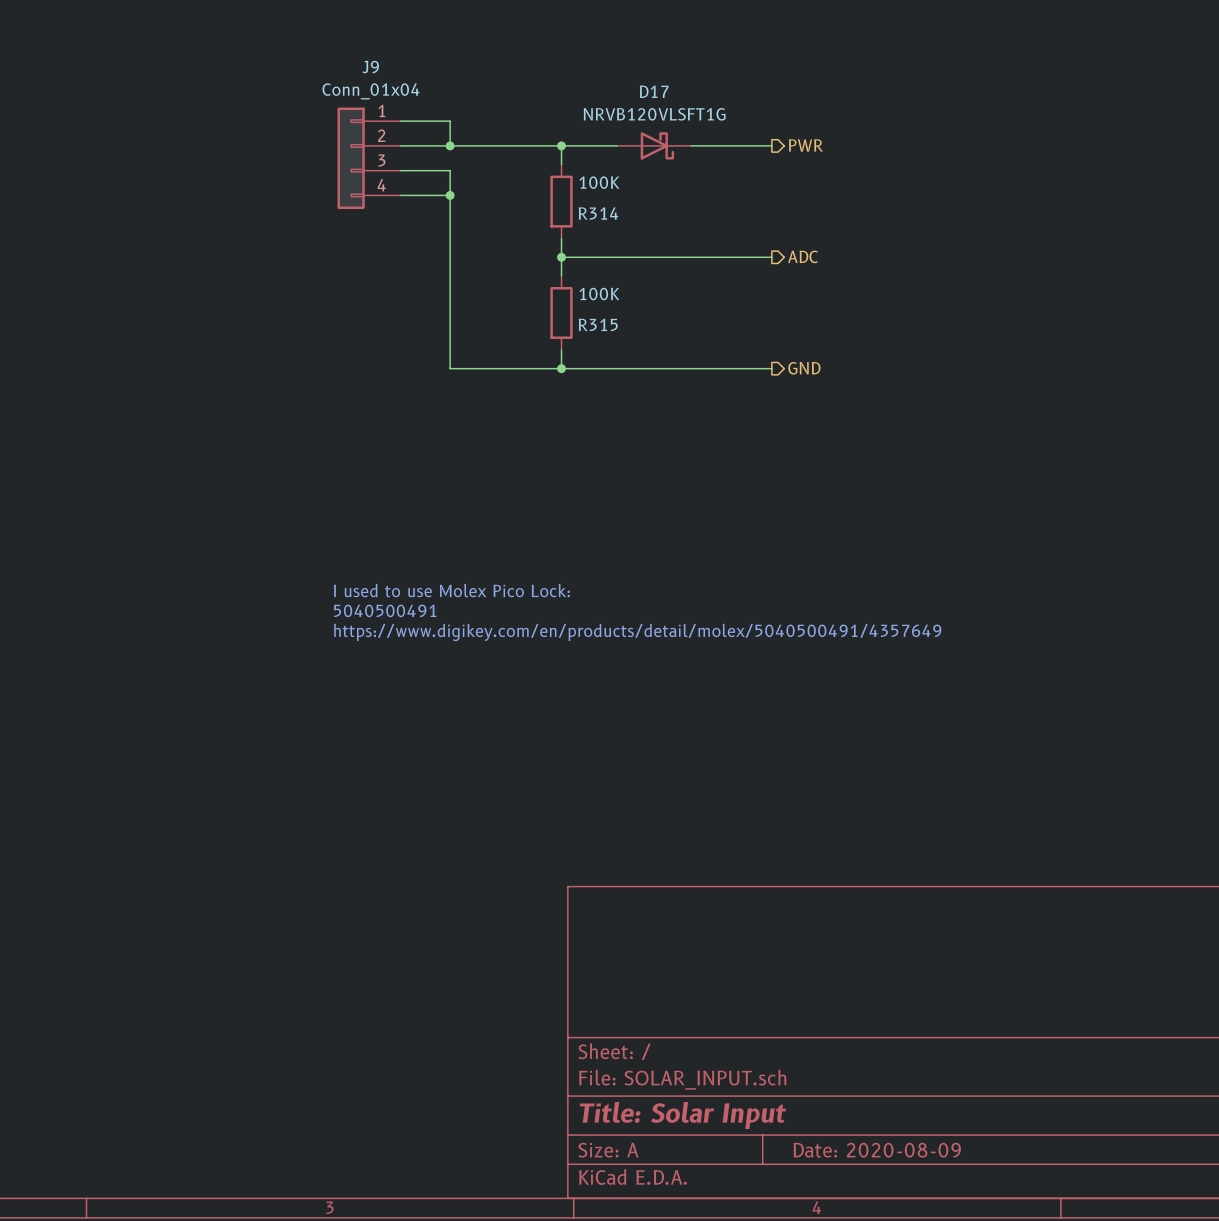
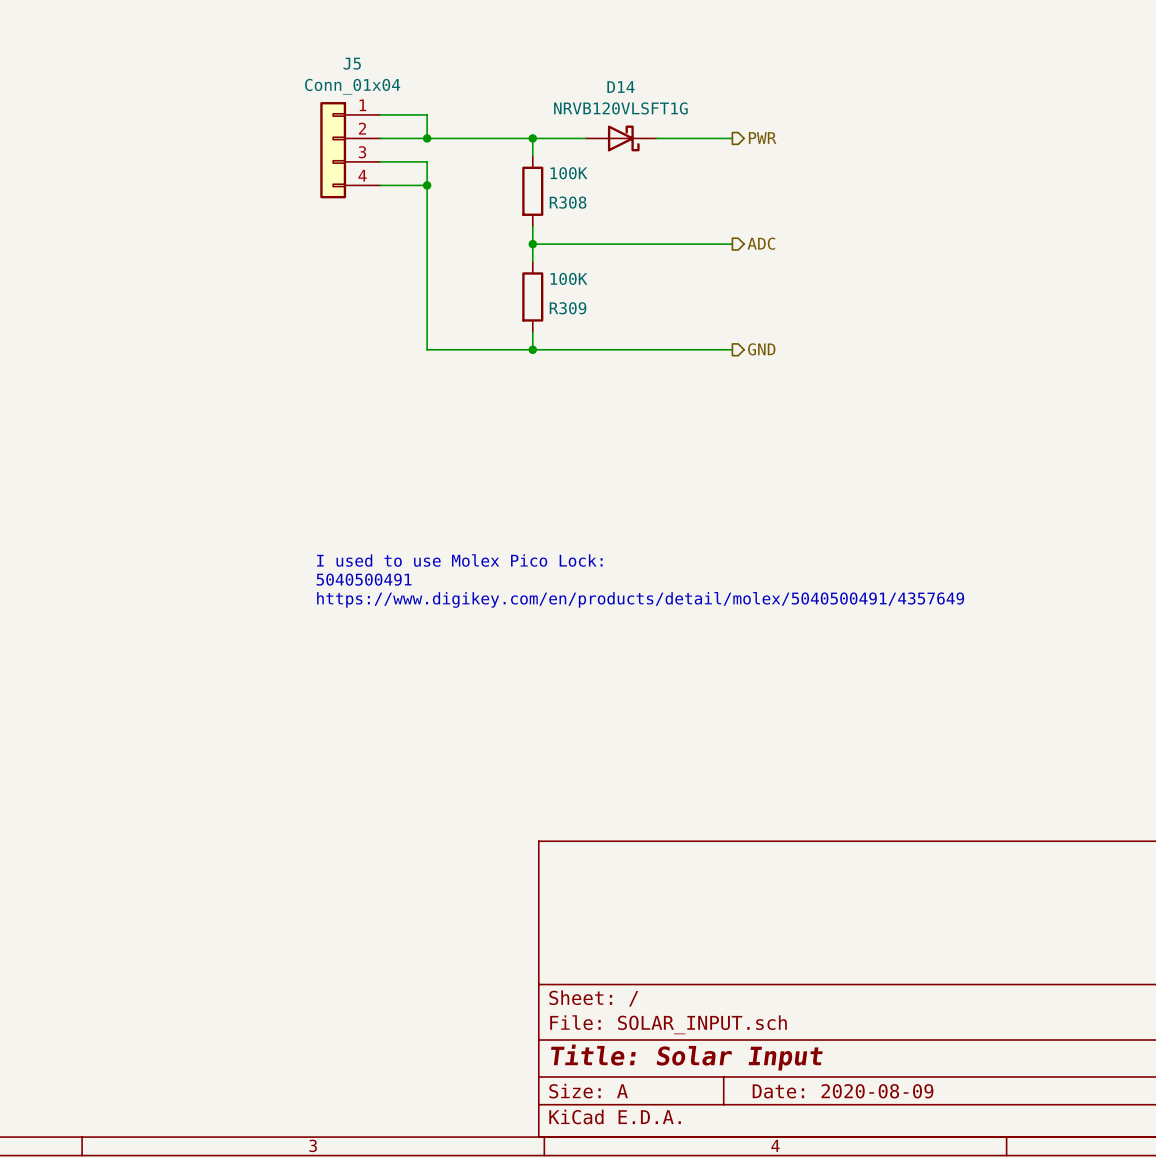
J9 name: J9 (370, 67) -> J5 (352, 63)
D17 name: D17 (654, 91) -> D14 (621, 87)
R314 name: R314 (598, 213) -> R308 (568, 202)
R315 name: R315 (598, 324) -> R309 (568, 308)

